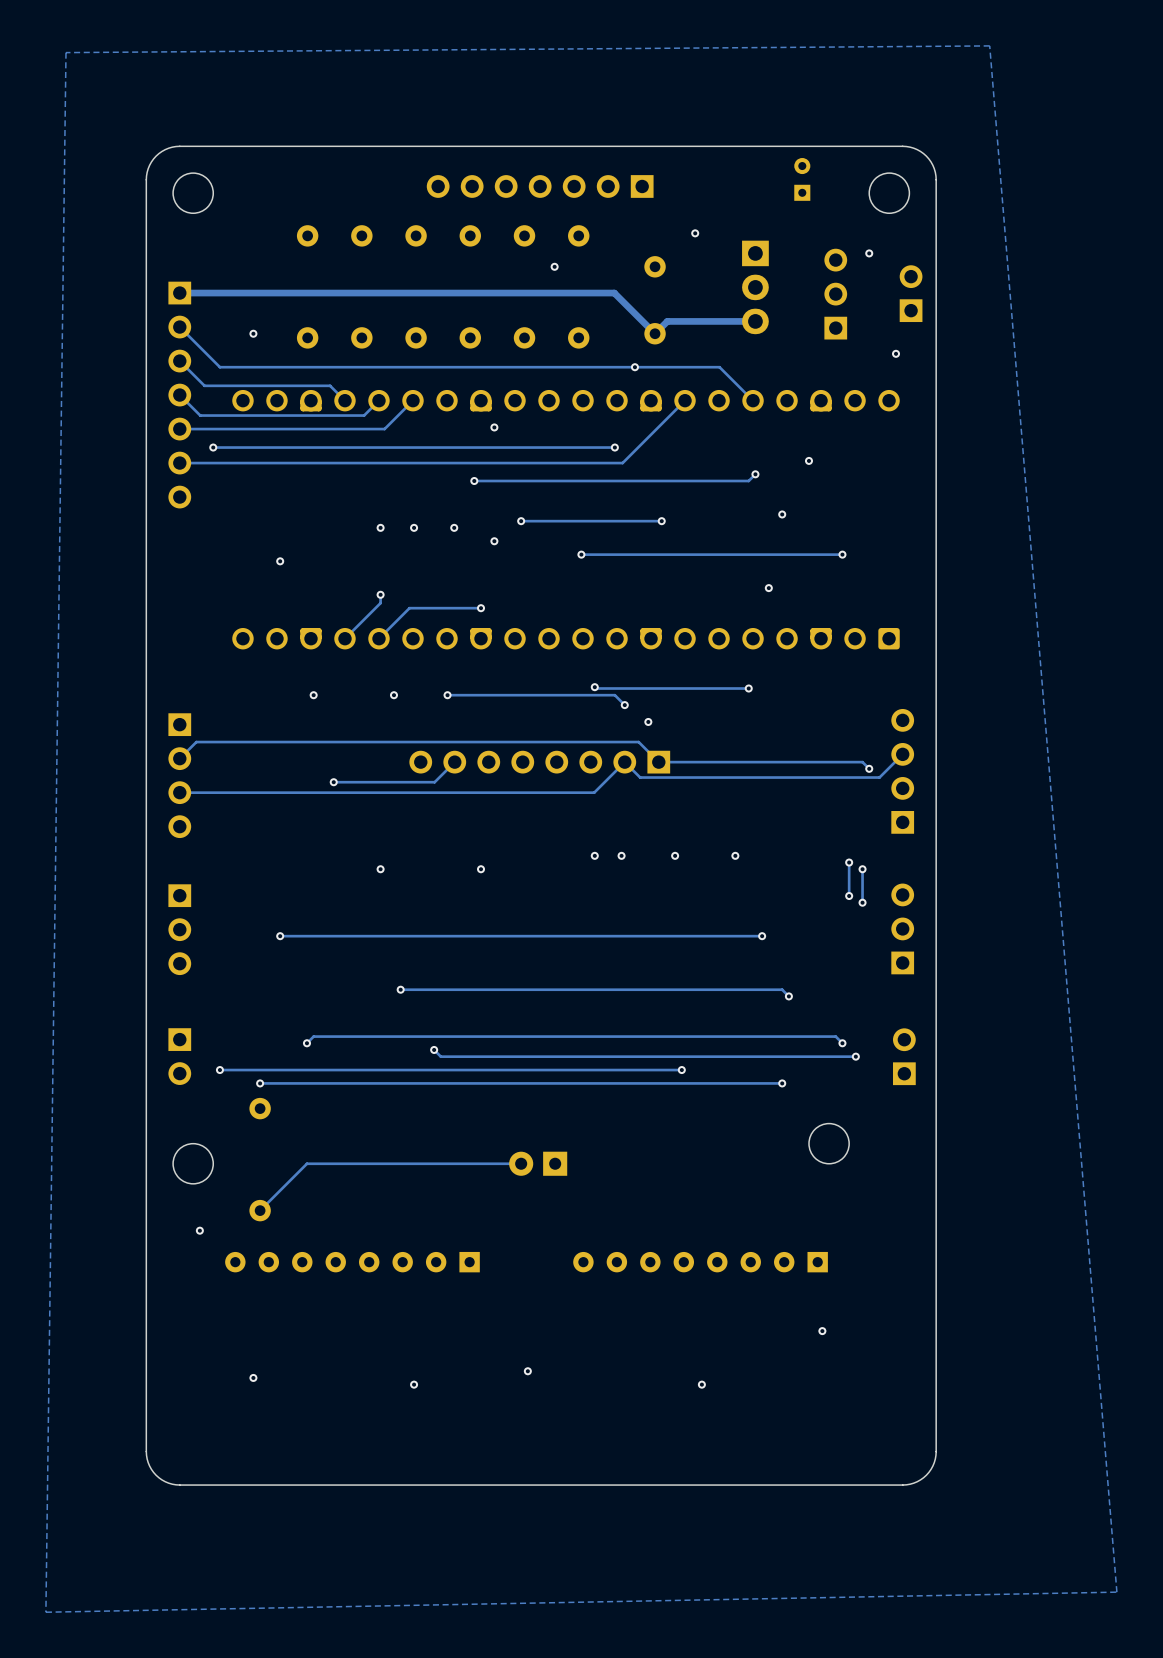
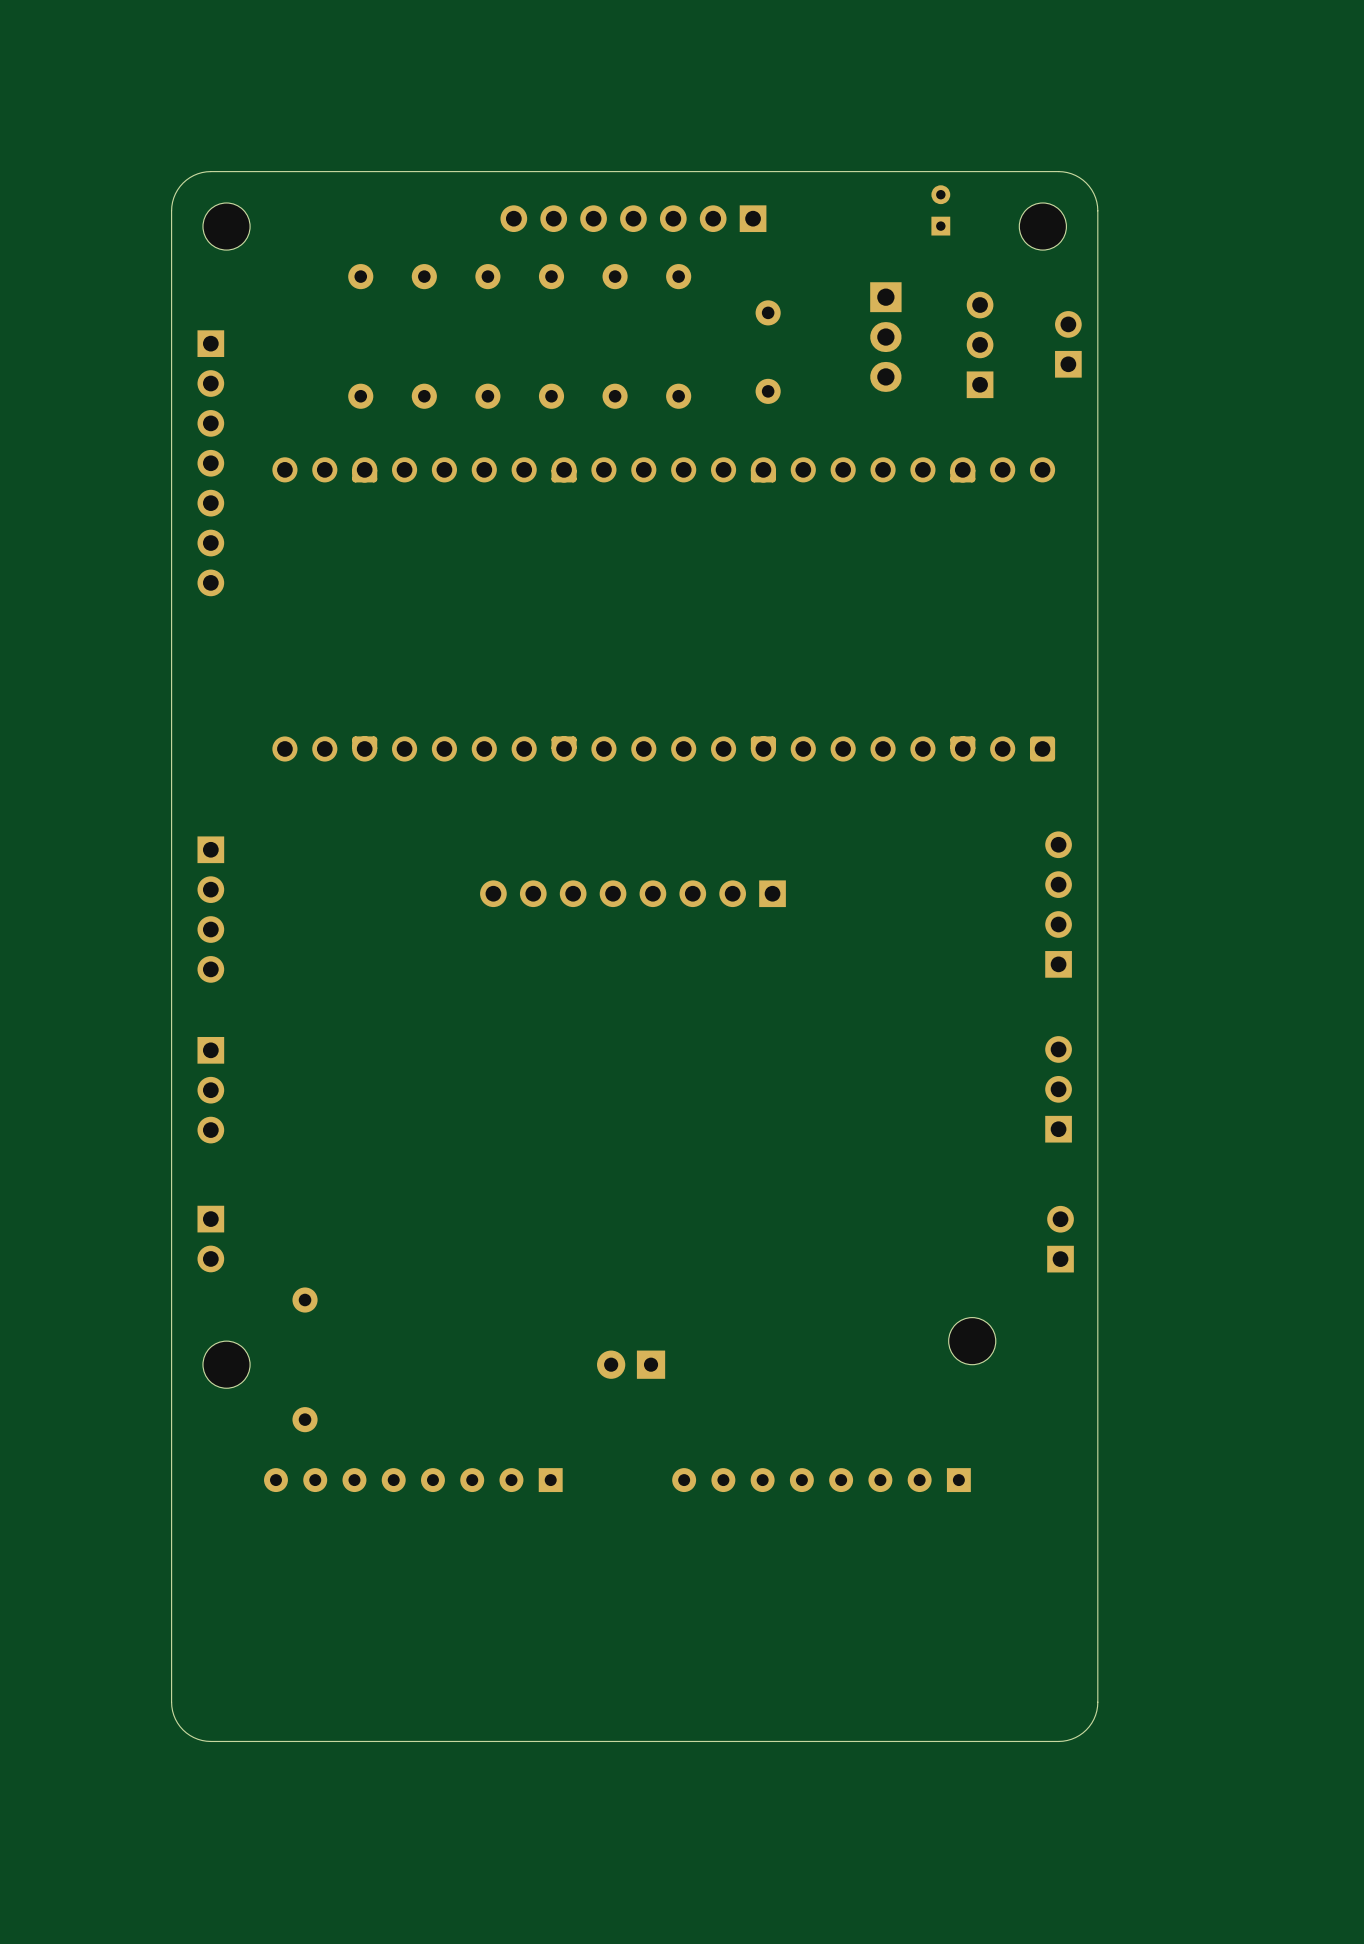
zone outline: (989, 45) (65, 52) (45, 1612) (1116, 1592) (989, 45) -> none
via: (695, 233) -> none
via: (869, 253) -> none
via: (554, 266) -> none
track: (179, 293) (614, 293) (655, 333) (667, 321) (755, 321) -> none
track: (179, 327) (219, 367) (719, 367) (753, 400) -> none
via: (253, 333) -> none
via: (896, 353) -> none
track: (179, 361) (204, 385) (330, 385) (344, 400) -> none
via: (634, 367) -> none
track: (179, 395) (200, 415) (364, 415) (378, 400) -> none
track: (412, 400) (384, 429) (179, 429) -> none
track: (685, 400) (622, 463) (179, 463) -> none
via: (494, 427) -> none
via: (213, 447) -> none
track: (614, 447) (213, 447) -> none
via: (614, 447) -> none
via: (808, 460) -> none
track: (755, 474) (748, 481) (474, 481) -> none
via: (755, 474) -> none
via: (474, 481) -> none
via: (782, 514) -> none
via: (521, 521) -> none
track: (661, 521) (521, 521) -> none
via: (661, 521) -> none
via: (380, 527) -> none
via: (414, 527) -> none
via: (454, 527) -> none
via: (494, 541) -> none
via: (581, 554) -> none
track: (842, 554) (581, 554) -> none
via: (842, 554) -> none
via: (280, 561) -> none
via: (768, 588) -> none
track: (380, 594) (380, 603) (344, 638) -> none
via: (380, 594) -> none
track: (481, 608) (409, 608) (378, 638) -> none
via: (481, 608) -> none
track: (594, 687) (748, 688) -> none
via: (594, 687) -> none
via: (748, 688) -> none
via: (313, 695) -> none
via: (393, 695) -> none
track: (447, 695) (614, 695) (624, 705) -> none
via: (447, 695) -> none
via: (624, 705) -> none
via: (648, 721) -> none
track: (902, 754) (879, 777) (640, 777) (624, 762) (594, 792) (179, 792) -> none
track: (179, 758) (196, 742) (638, 742) (658, 762) (862, 762) (869, 768) -> none
track: (454, 762) (434, 782) (333, 782) -> none
via: (869, 768) -> none
via: (333, 782) -> none
via: (594, 855) -> none
via: (621, 855) -> none
via: (675, 855) -> none
via: (735, 855) -> none
track: (849, 862) (849, 896) -> none
via: (849, 862) -> none
via: (380, 869) -> none
via: (481, 869) -> none
track: (862, 869) (862, 902) -> none
via: (862, 869) -> none
via: (849, 896) -> none
via: (862, 902) -> none
via: (280, 936) -> none
track: (762, 936) (280, 936) -> none
via: (762, 936) -> none
track: (400, 989) (782, 989) (788, 996) -> none
via: (400, 989) -> none
via: (788, 996) -> none
via: (306, 1043) -> none
track: (842, 1043) (835, 1036) (313, 1036) (306, 1043) -> none
via: (842, 1043) -> none
track: (434, 1049) (440, 1056) (855, 1056) -> none
via: (434, 1049) -> none
via: (855, 1056) -> none
via: (219, 1070) -> none
track: (681, 1070) (219, 1070) -> none
via: (681, 1070) -> none
via: (260, 1083) -> none
track: (782, 1083) (260, 1083) -> none
via: (782, 1083) -> none
track: (521, 1163) (306, 1163) (260, 1210) -> none
via: (199, 1230) -> none
via: (822, 1331) -> none
via: (527, 1371) -> none
via: (253, 1377) -> none
via: (414, 1384) -> none
via: (701, 1384) -> none

